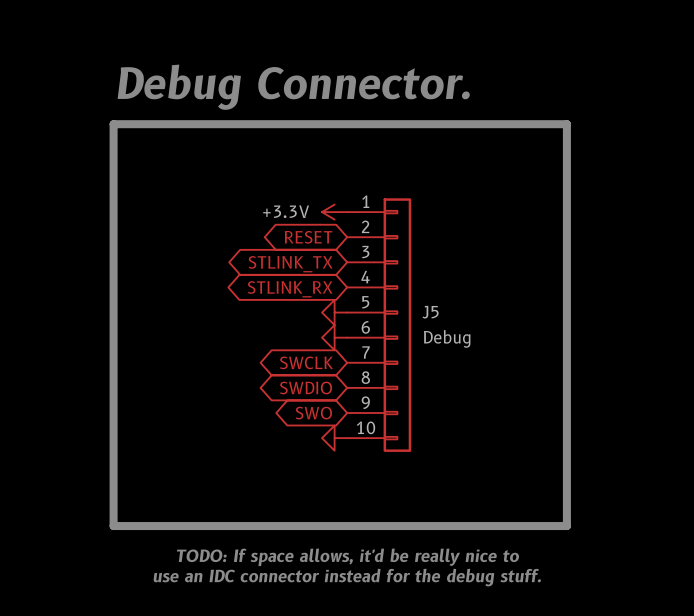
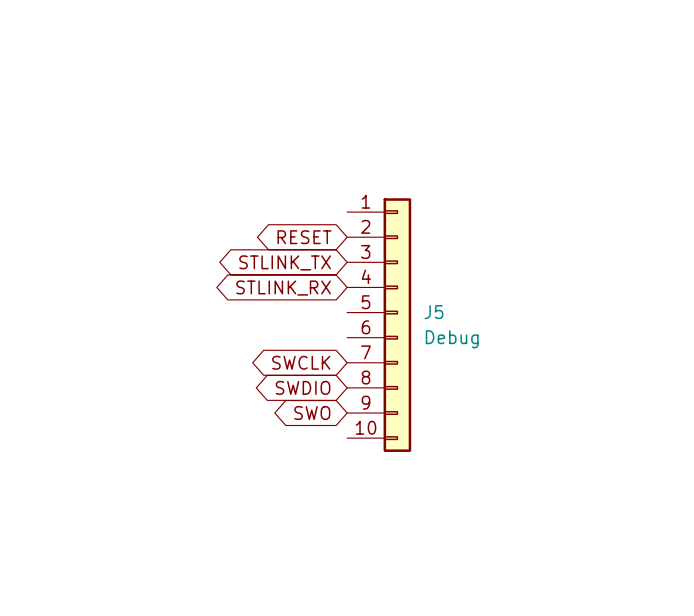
text: Debug Connector. (293, 87) -> none
line: (113, 124) (566, 124) (566, 526) (113, 526) (113, 124) -> none
power symbol: +3.3V (334, 212) -> none
power symbol: (334, 312) -> none
power symbol: (334, 337) -> none
power symbol: (334, 438) -> none
text: TODO: If space allows, it'd be really nice to (347, 557) -> none
text: use an IDC connector instead for the debug stuff. (347, 577) -> none

